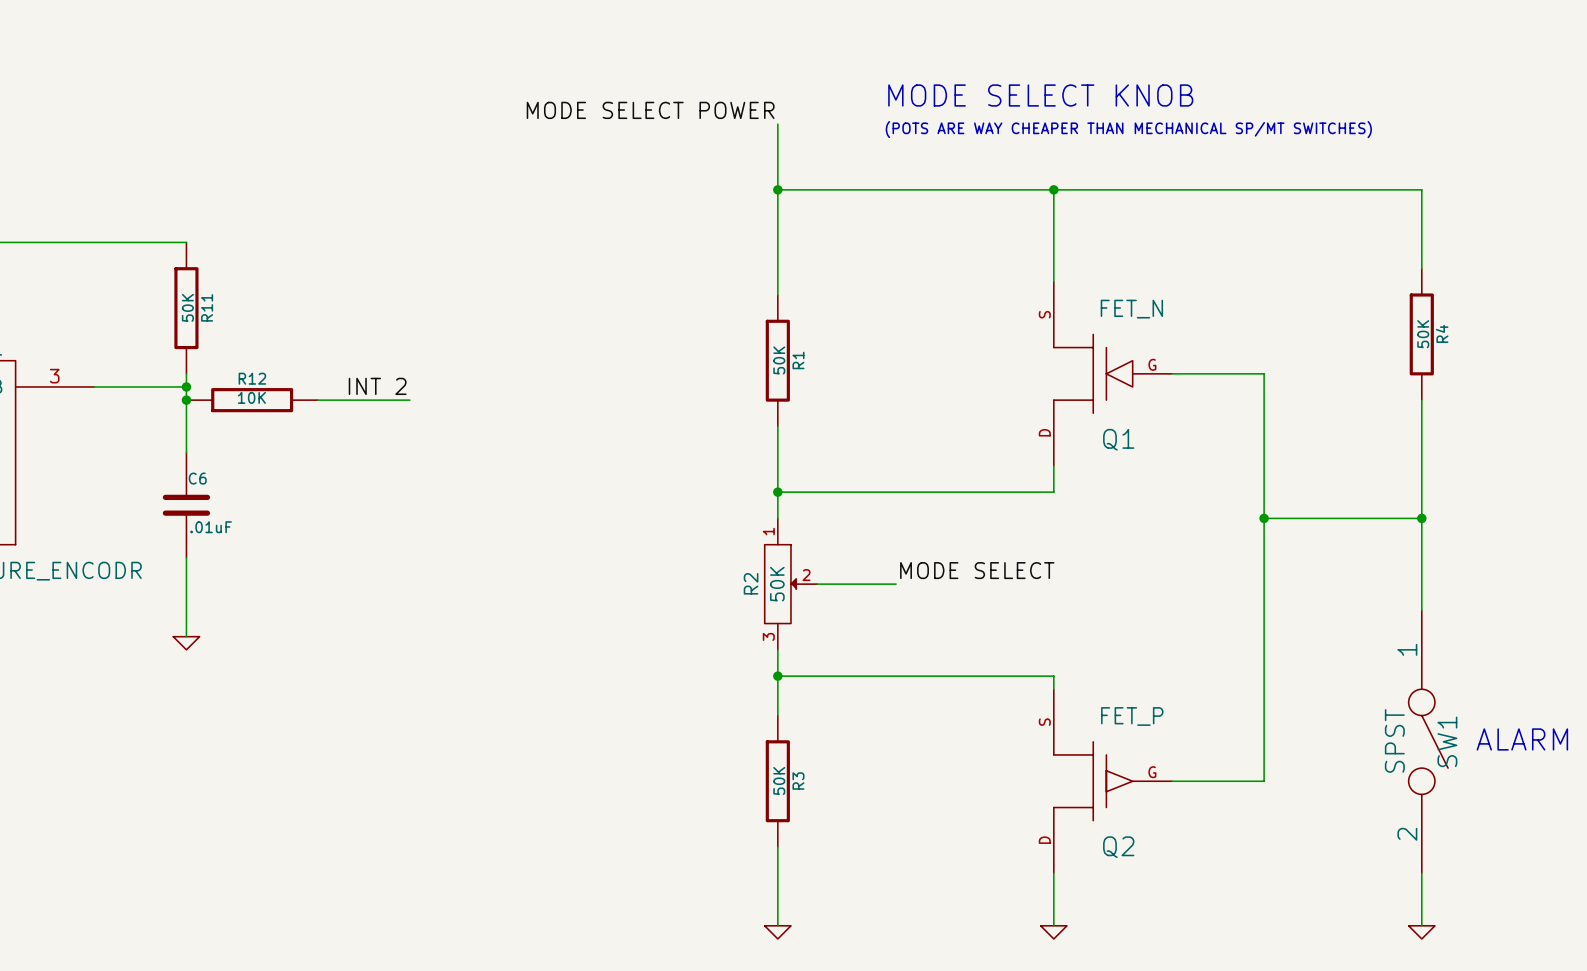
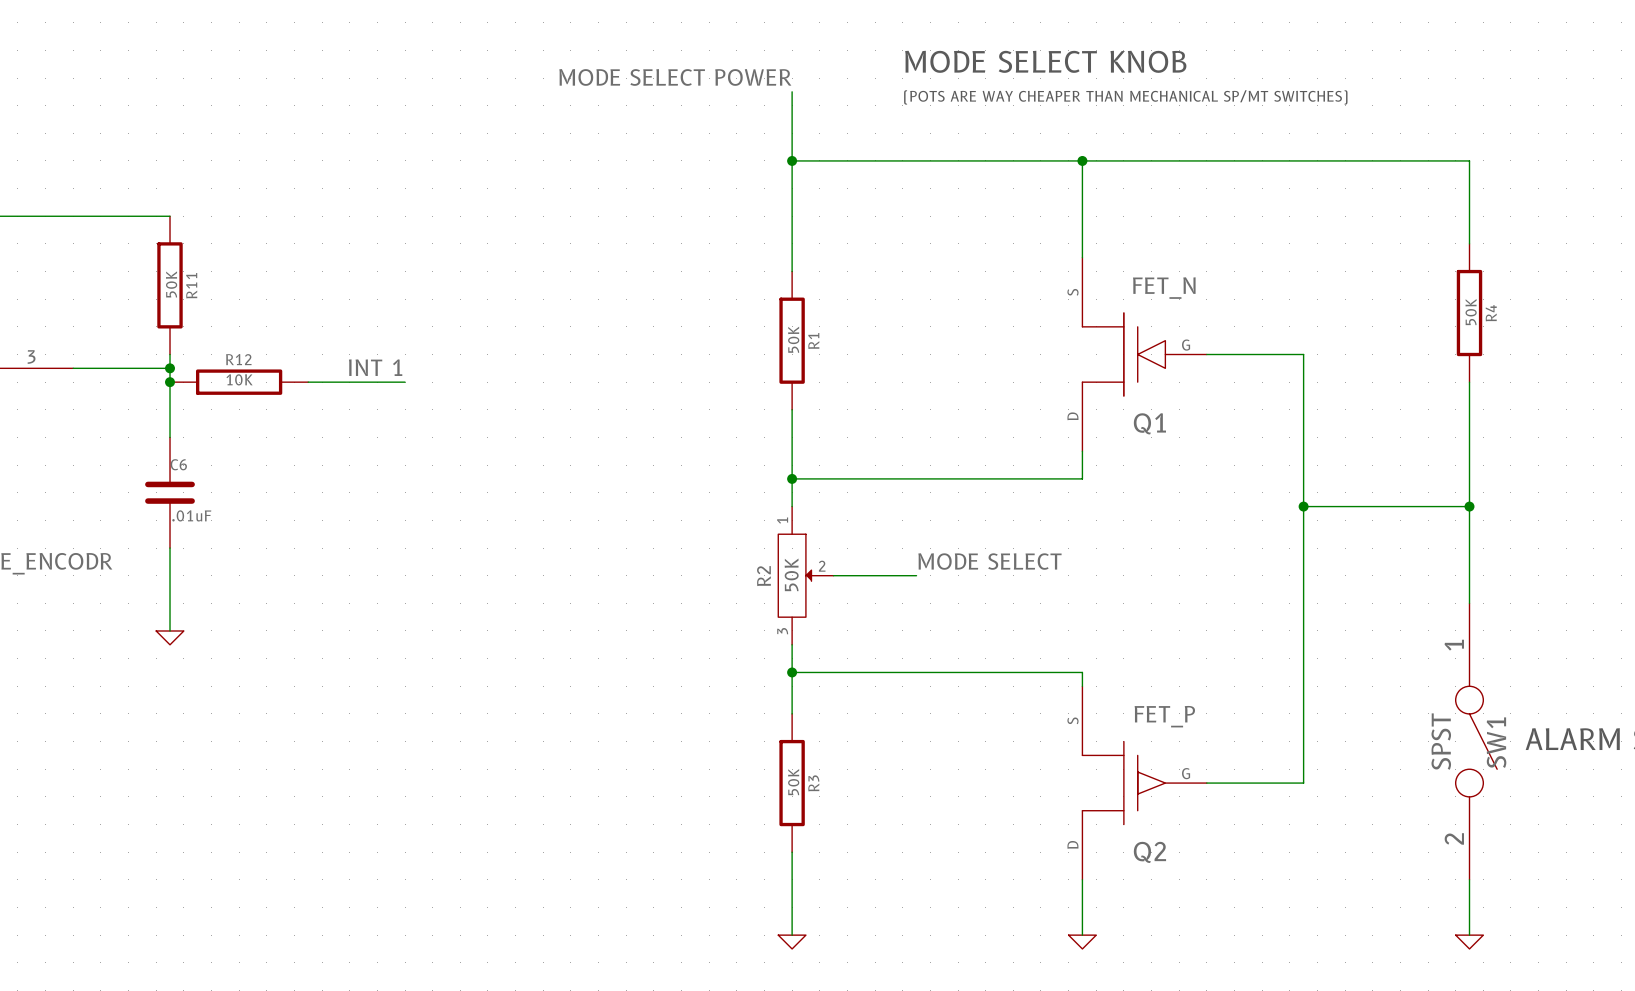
label: INT 2 (377, 386) -> INT 1 (375, 367)

